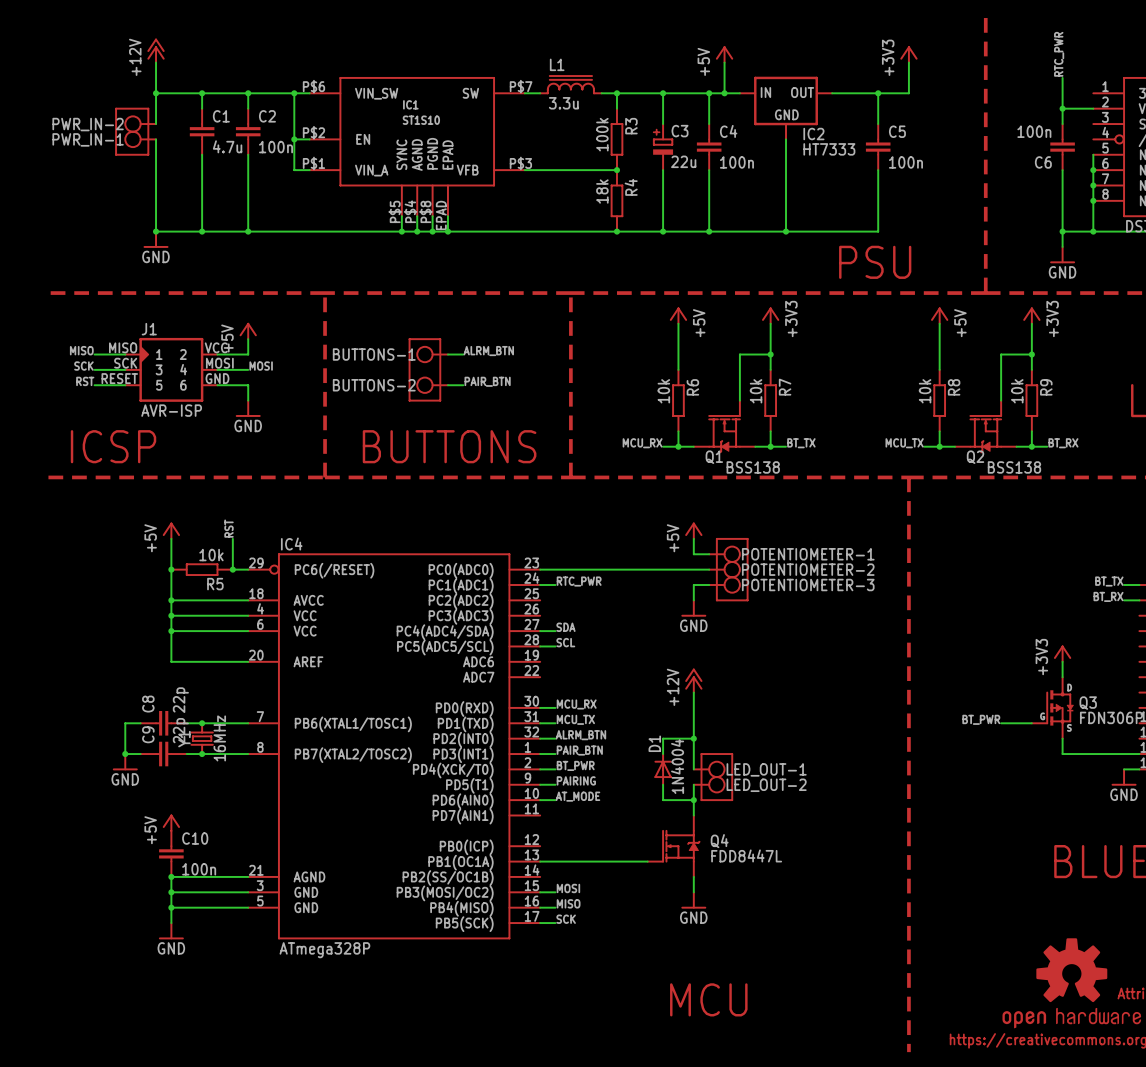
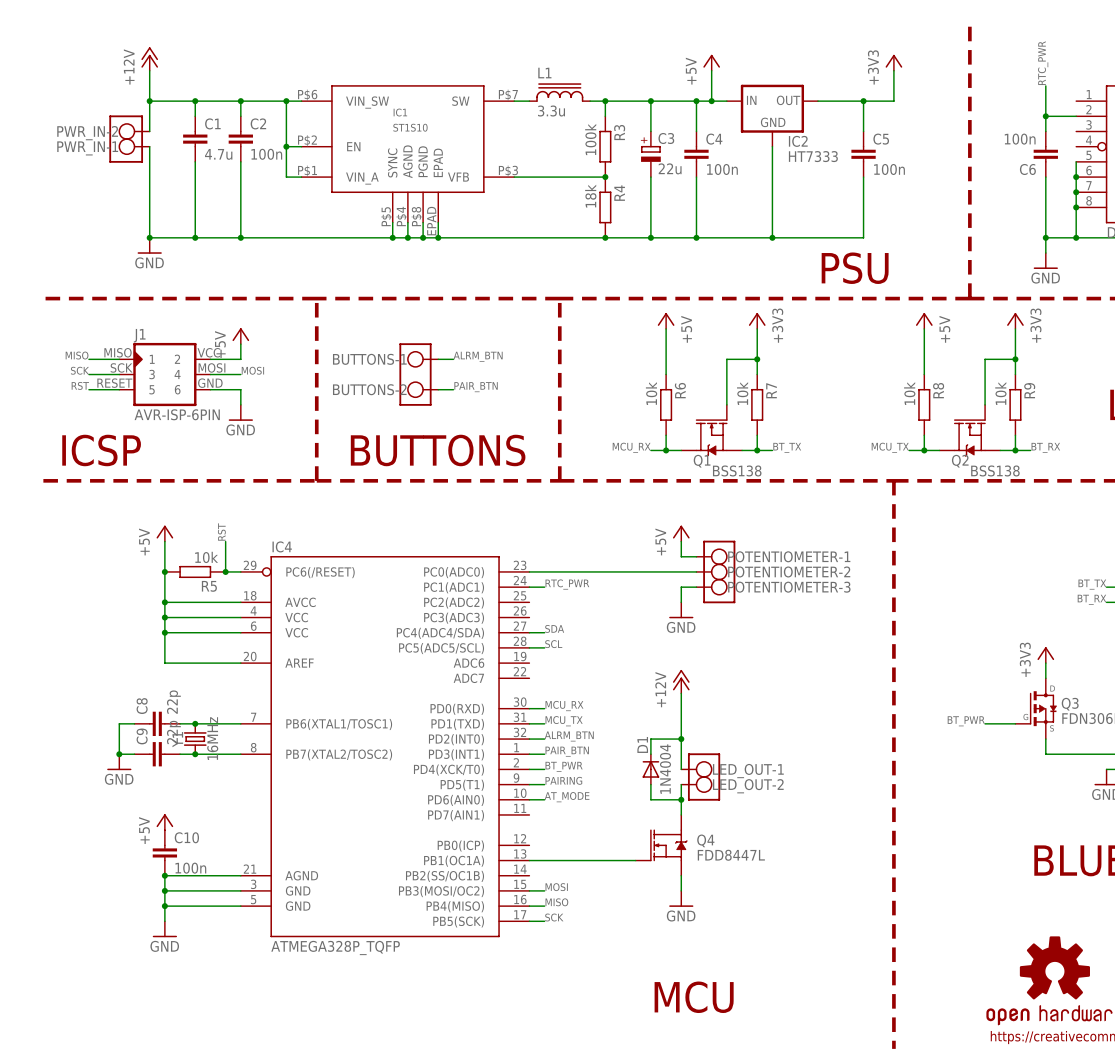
J1 value: AVR-ISP (171, 410) -> AVR-ISP-6PIN (177, 414)
IC4 value: ATmega328P (324, 950) -> ATMEGA328P_TQFP (335, 947)

